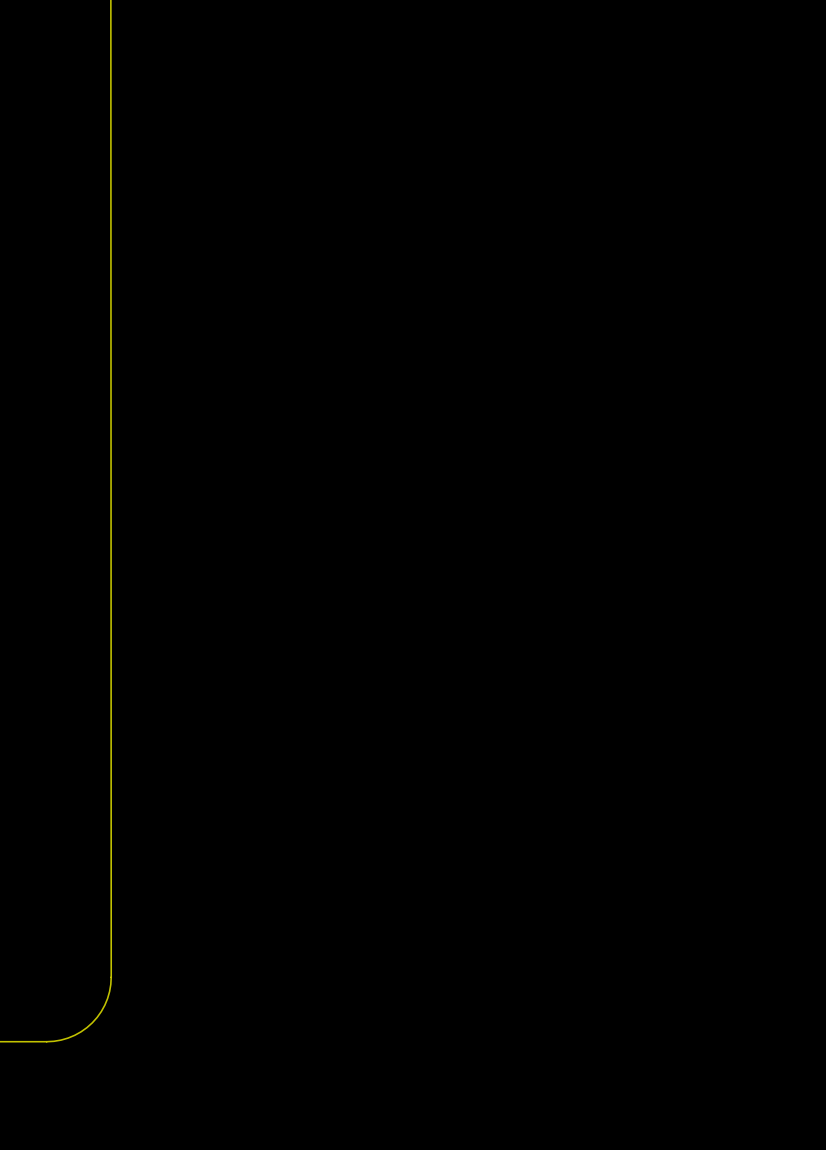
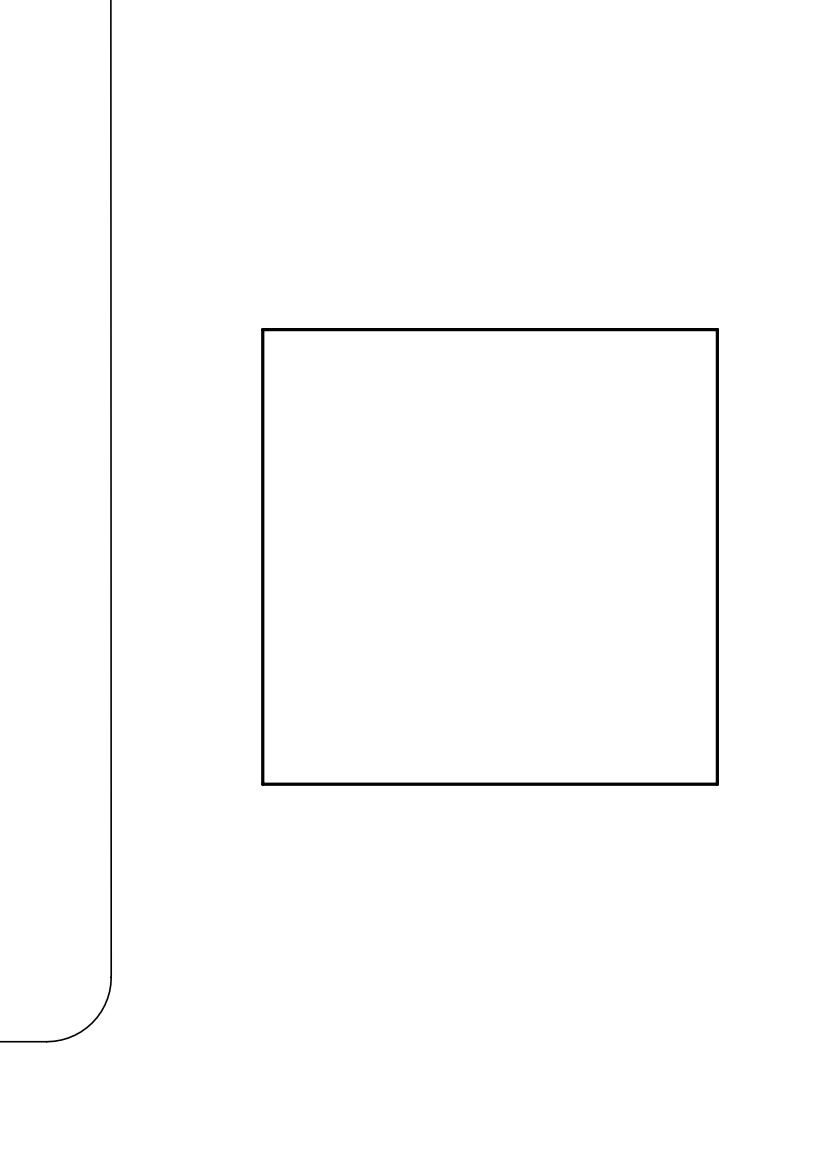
drawing: none -> [261, 328, 719, 786]

